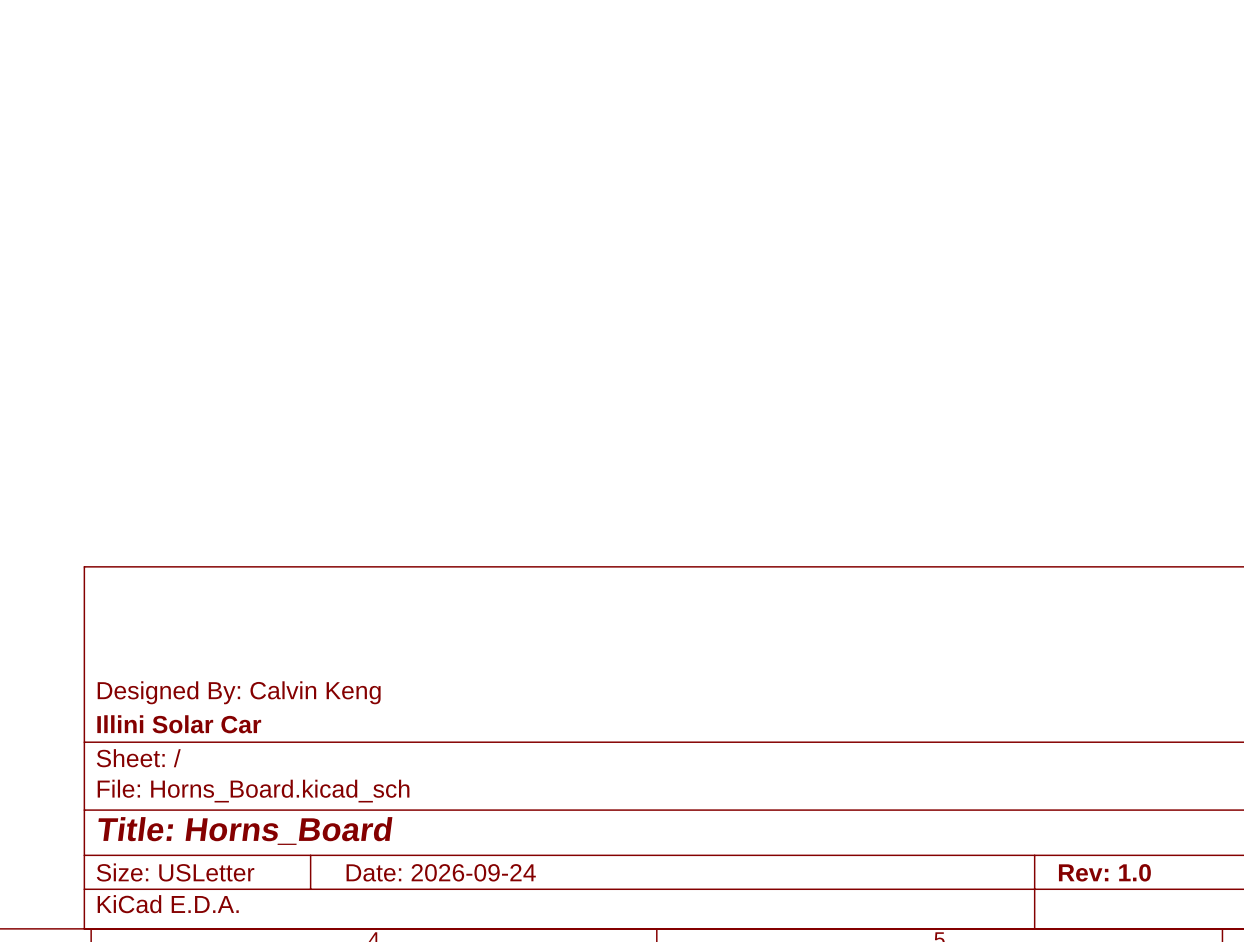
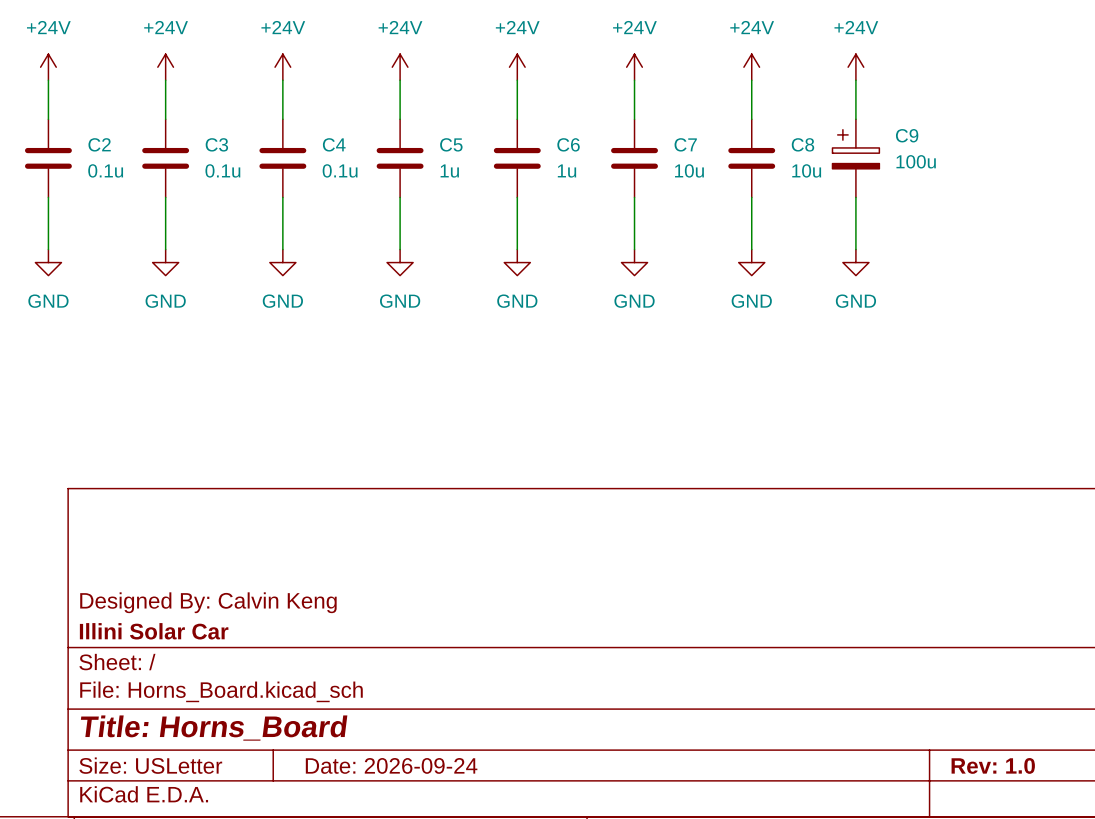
power symbol: none -> +24V (48, 67)
power symbol: none -> +24V (165, 67)
power symbol: none -> +24V (282, 67)
power symbol: none -> +24V (400, 67)
power symbol: none -> +24V (517, 67)
power symbol: none -> +24V (634, 67)
power symbol: none -> +24V (751, 67)
power symbol: none -> +24V (855, 67)
wire: none -> (48, 80) (48, 119)
wire: none -> (165, 80) (165, 119)
wire: none -> (282, 80) (282, 119)
wire: none -> (400, 80) (400, 119)
wire: none -> (517, 80) (517, 119)
wire: none -> (634, 80) (634, 119)
wire: none -> (751, 80) (751, 119)
wire: none -> (855, 80) (855, 119)
C2: none -> 0.1u (48, 158)
C3: none -> 0.1u (165, 158)
C4: none -> 0.1u (282, 158)
C5: none -> 1u (400, 158)
C6: none -> 1u (517, 158)
C7: none -> 10u (634, 158)
C8: none -> 10u (751, 158)
C9: none -> 100u (855, 158)
wire: none -> (48, 197) (48, 249)
wire: none -> (165, 197) (165, 249)
wire: none -> (282, 197) (282, 249)
wire: none -> (400, 197) (400, 249)
wire: none -> (517, 197) (517, 249)
wire: none -> (634, 197) (634, 249)
wire: none -> (751, 197) (751, 249)
wire: none -> (855, 197) (855, 249)
power symbol: none -> GND (48, 262)
power symbol: none -> GND (165, 262)
power symbol: none -> GND (282, 262)
power symbol: none -> GND (400, 262)
power symbol: none -> GND (517, 262)
power symbol: none -> GND (634, 262)
power symbol: none -> GND (751, 262)
power symbol: none -> GND (855, 262)

